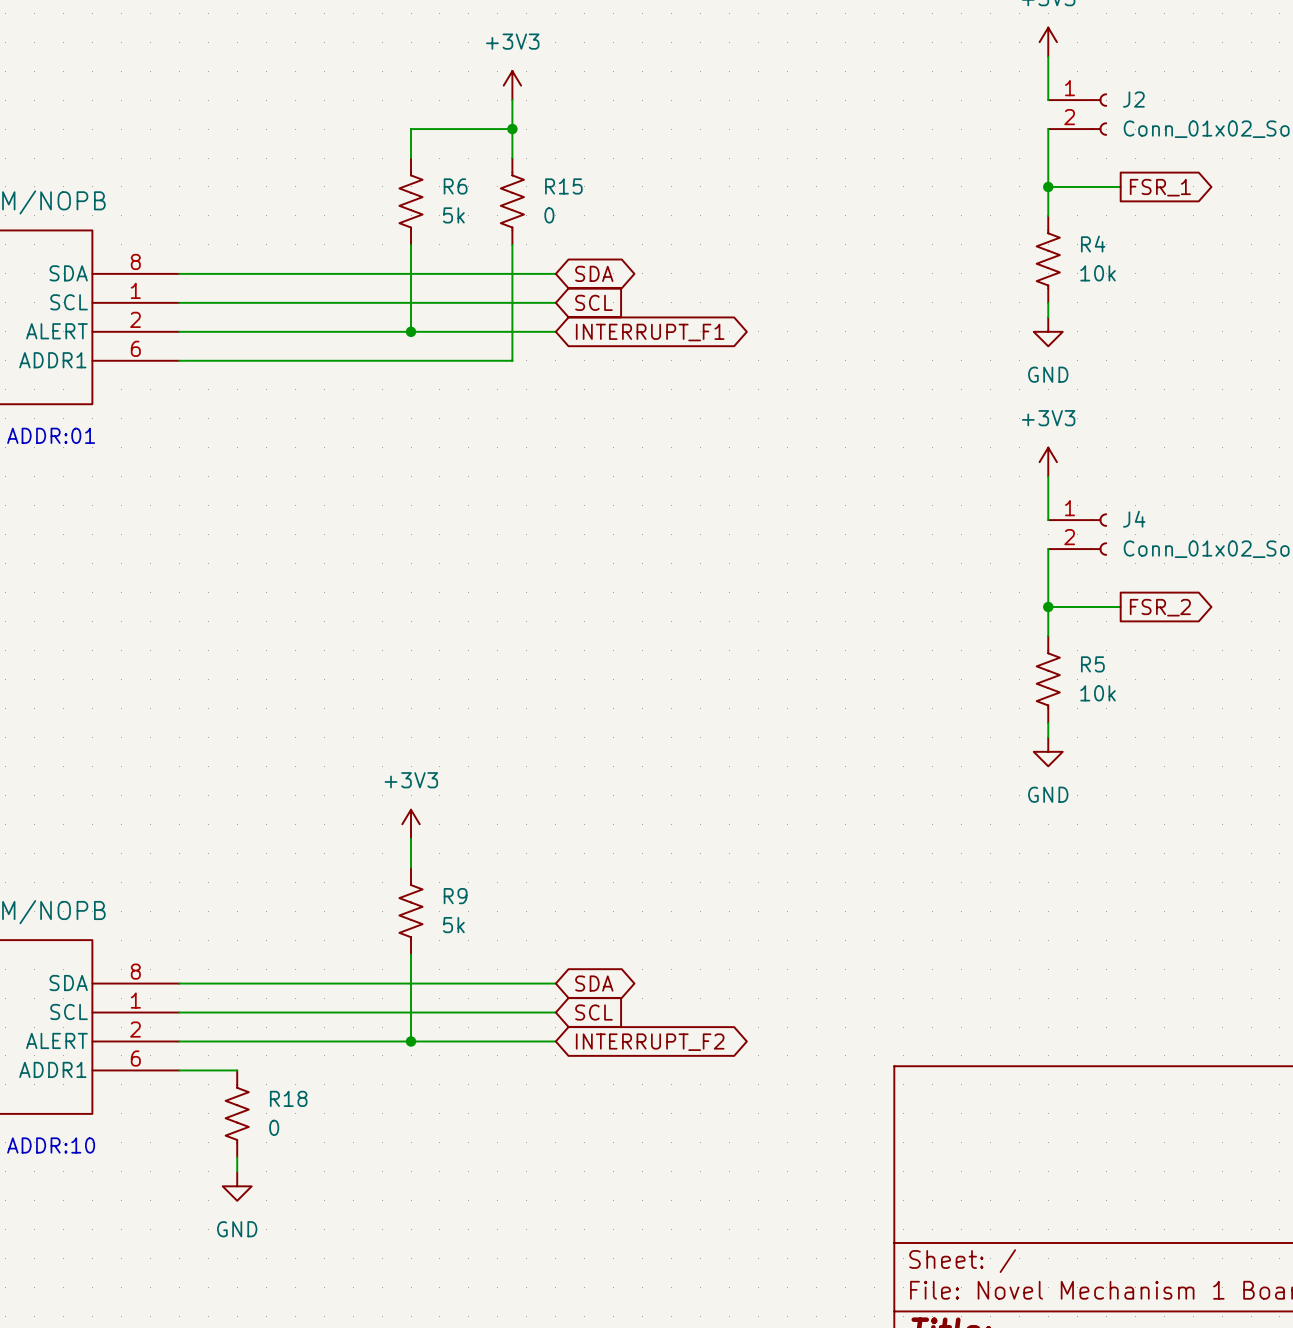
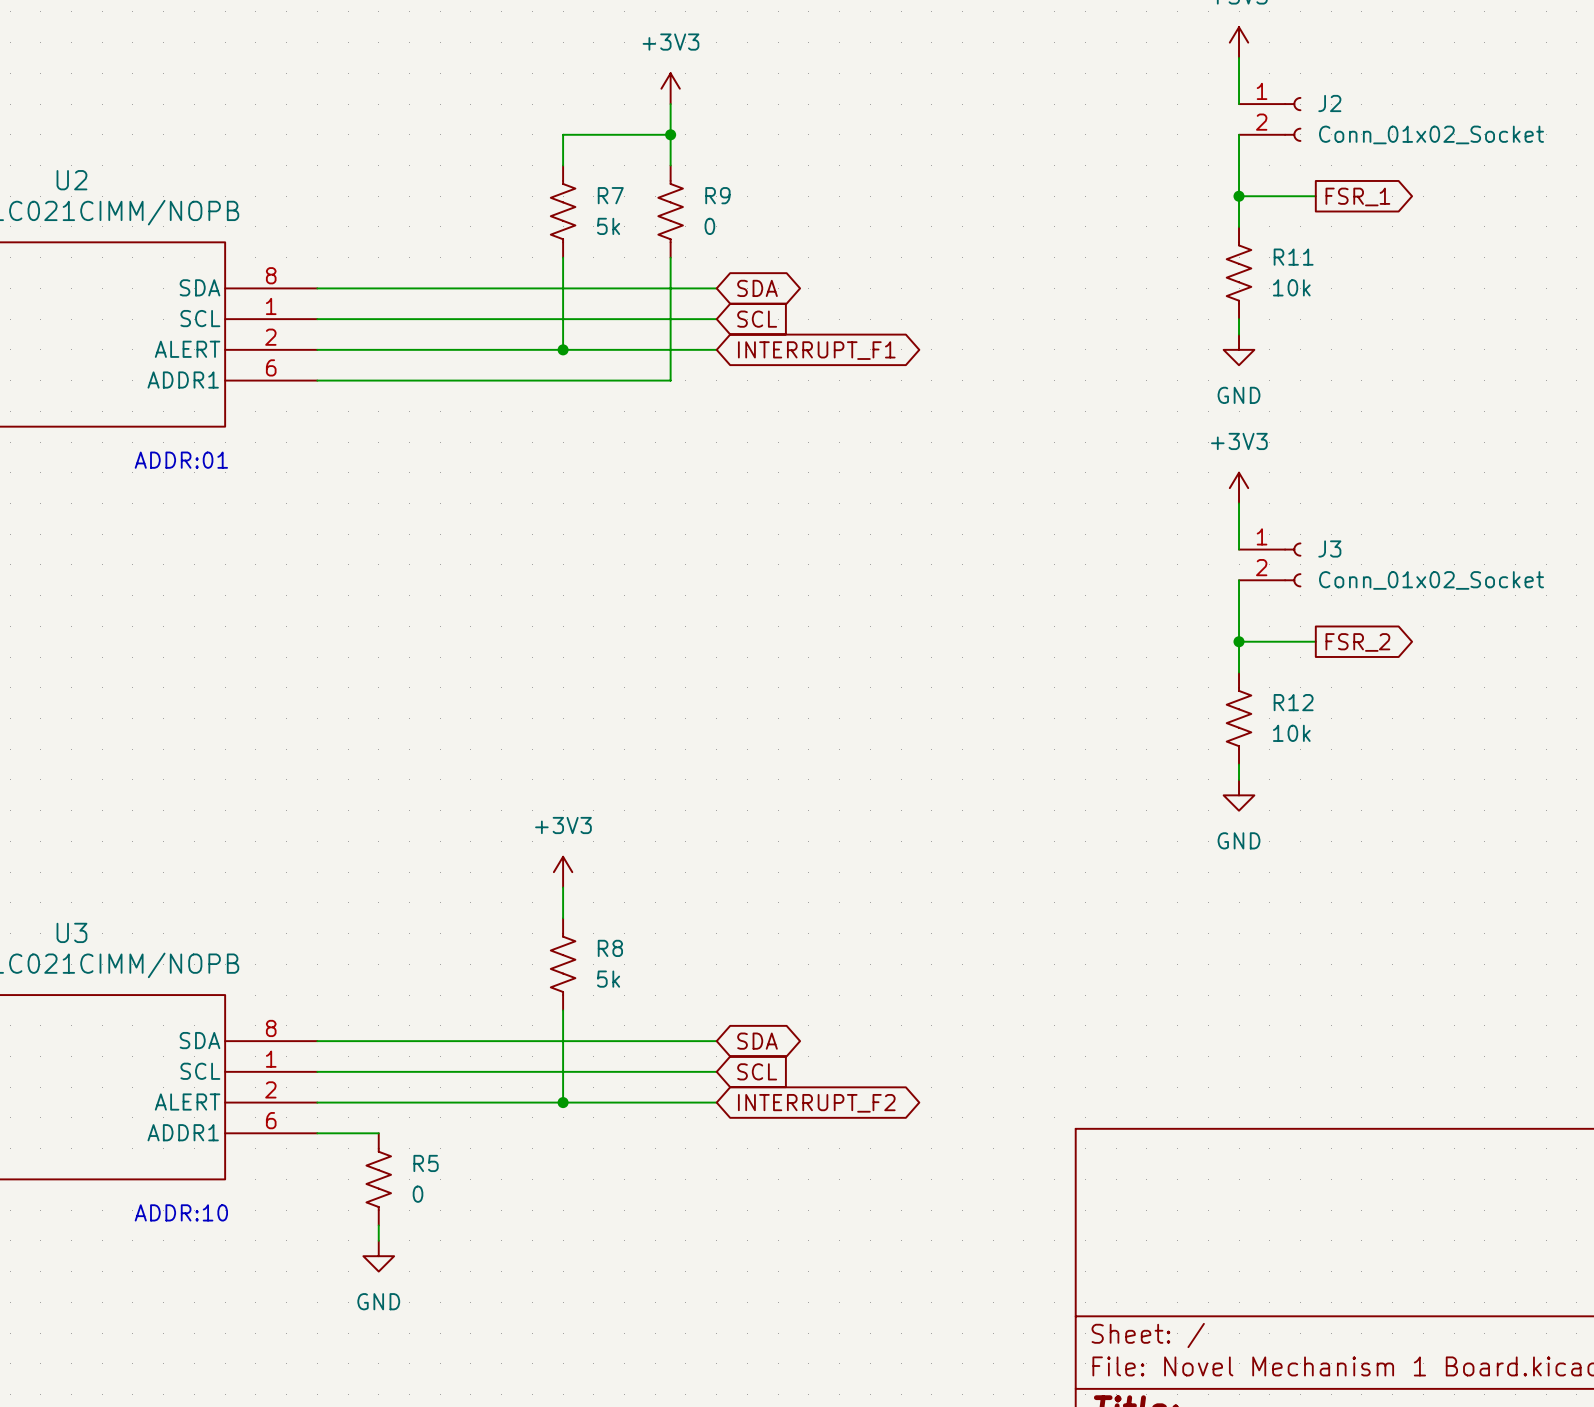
R6 name: R6 (455, 186) -> R7 (610, 195)
R15 name: R15 (563, 186) -> R9 (717, 195)
R4 name: R4 (1093, 244) -> R11 (1293, 257)
J4 name: J4 (1134, 519) -> J3 (1329, 548)
R5 name: R5 (1092, 664) -> R12 (1293, 702)
R9 name: R9 (455, 896) -> R8 (610, 948)
R18 name: R18 (288, 1098) -> R5 (426, 1163)

